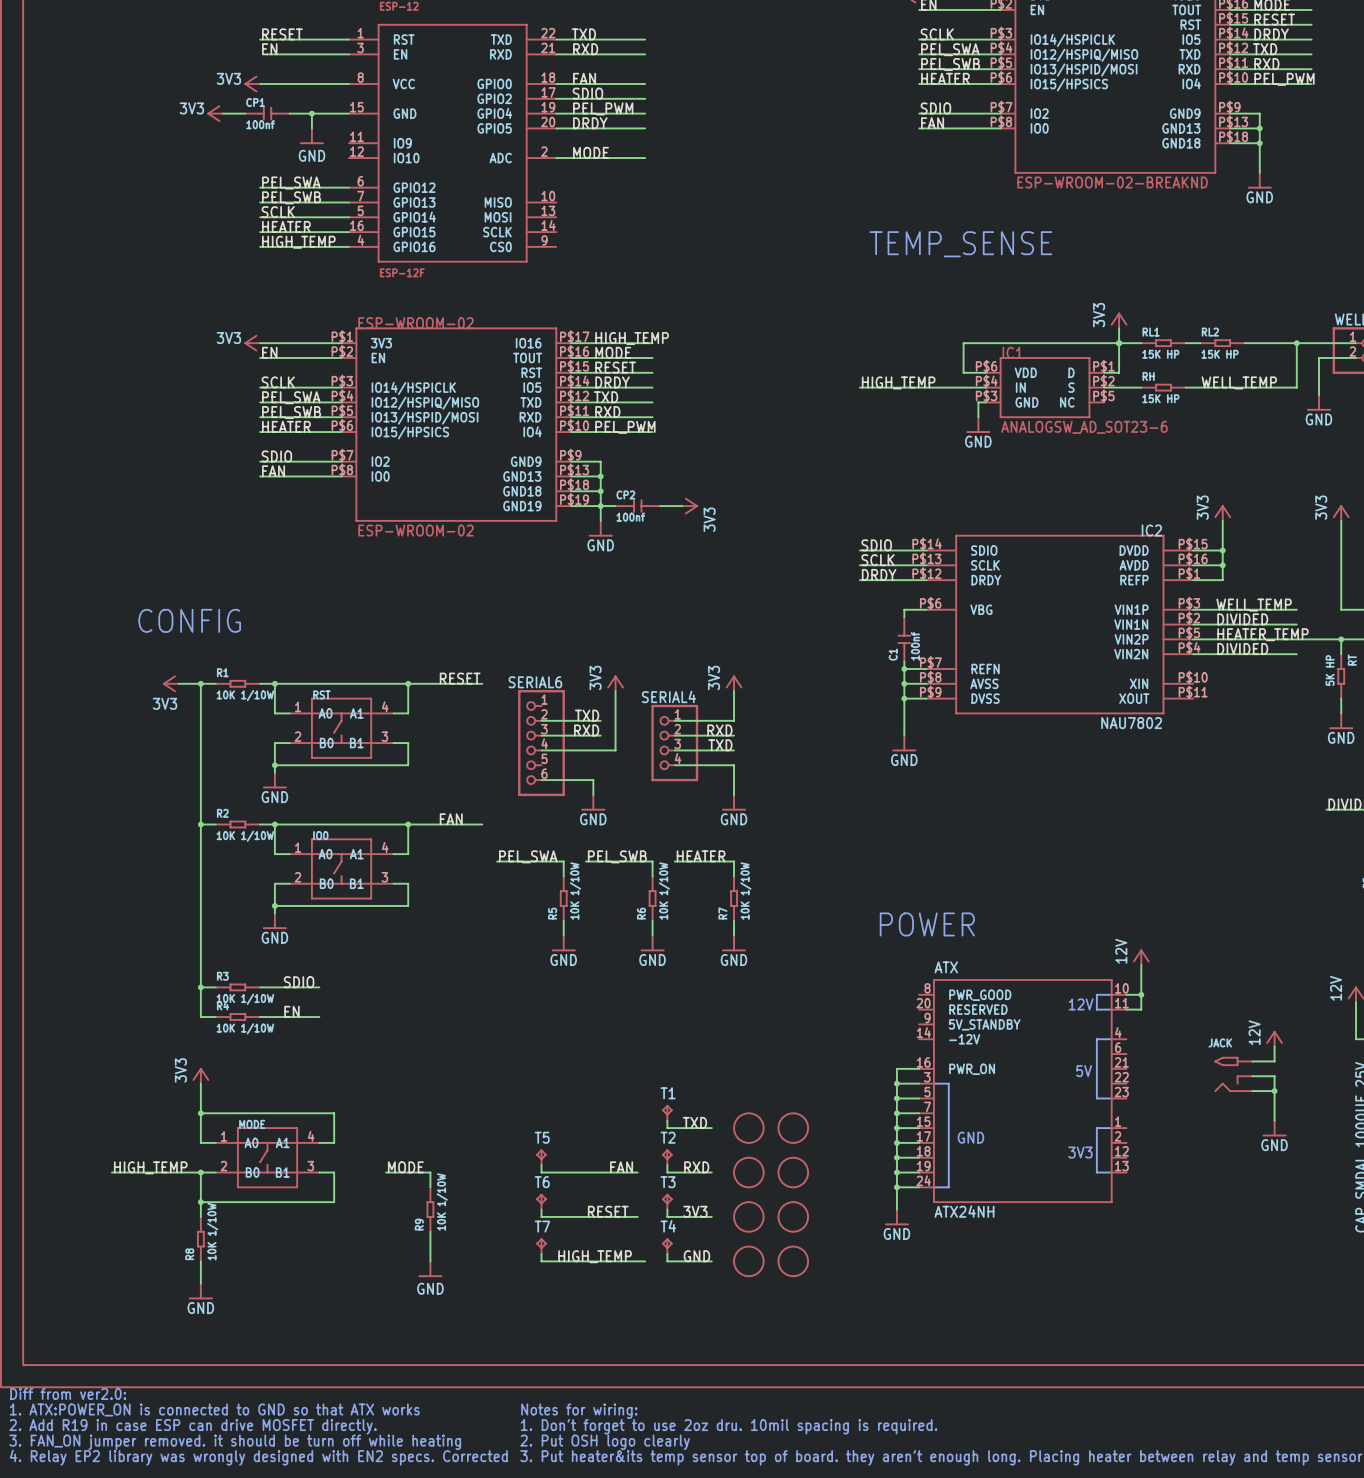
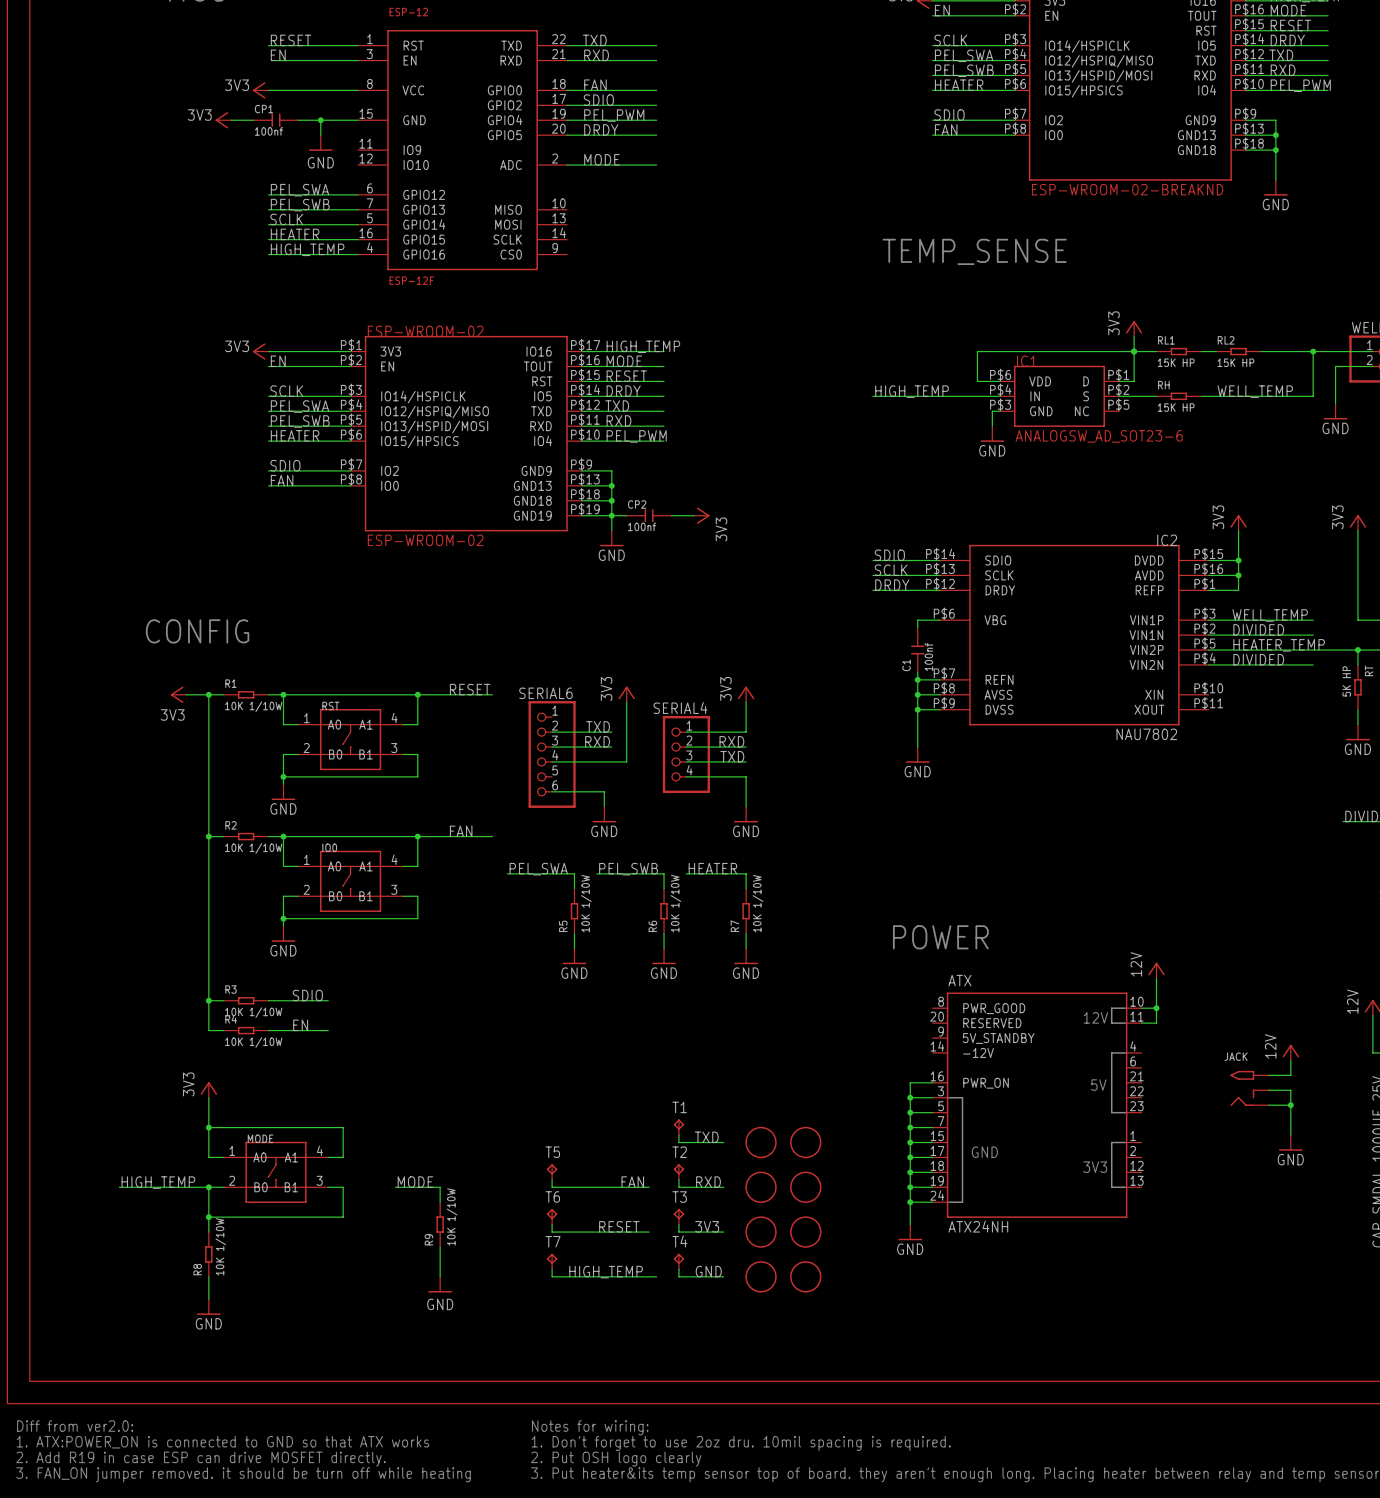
text: Diff from ver2.0: (68, 1393) -> none
text: 1. ATX:POWER_ON is connected to GND so that ATX works (214, 1409) -> Diff from ver2.0: (75, 1426)
text: 2. Add R19 in case ESP can drive MOSFET directly. (193, 1426) -> 1. ATX:POWER_ON is connected to GND so that ATX works (222, 1442)
text: 3. FAN_ON jumper removed. it should be turn off while heating (235, 1442) -> 2. Add R19 in case ESP can drive MOSFET directly. (200, 1459)
text: 4. Relay EP2 library was wrongly designed with EN2 specs. Corrected (258, 1457) -> 3. FAN_ON jumper removed. it should be turn off while heating (243, 1474)

